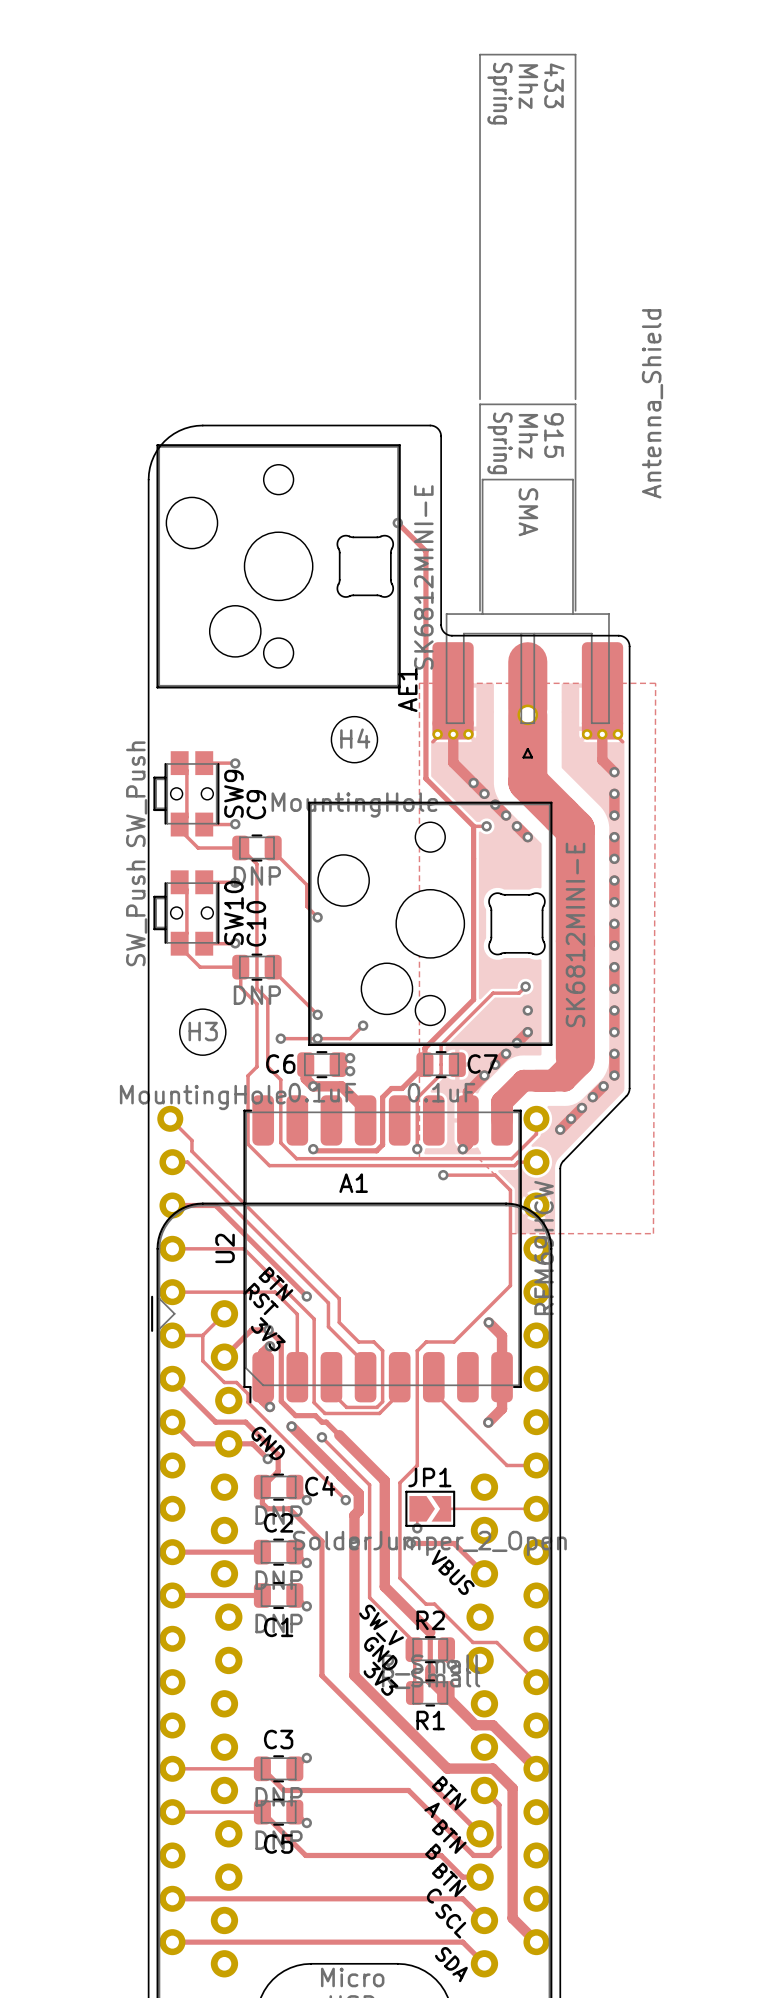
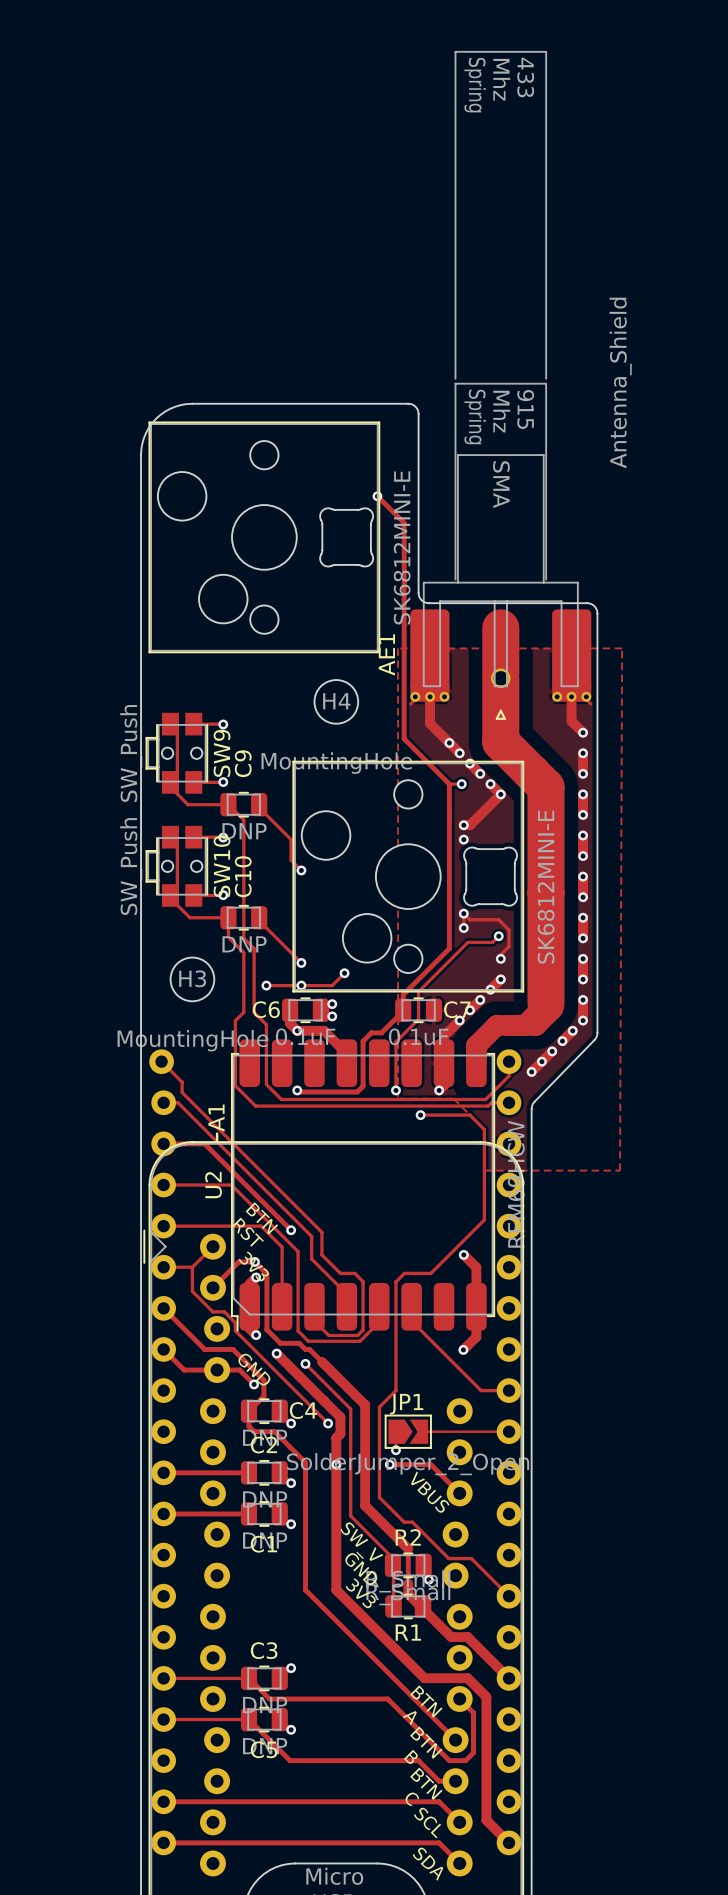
track: none -> (500, 794) (469, 825) (463, 825)
via: none -> (463, 825)
via: none -> (463, 839)
via: none -> (463, 913)
track: none -> (463, 928) (463, 913) (469, 919) (498, 919) (509, 930) (509, 946) (500, 954) (500, 958)
via: none -> (463, 928)
A1 name rotation: 0° (353, 1183) -> 90° counterclockwise (216, 1118)
A1 name position: A1 (353, 1183) -> A1 (216, 1118)
line: none -> (217, 1133) (217, 1141)

